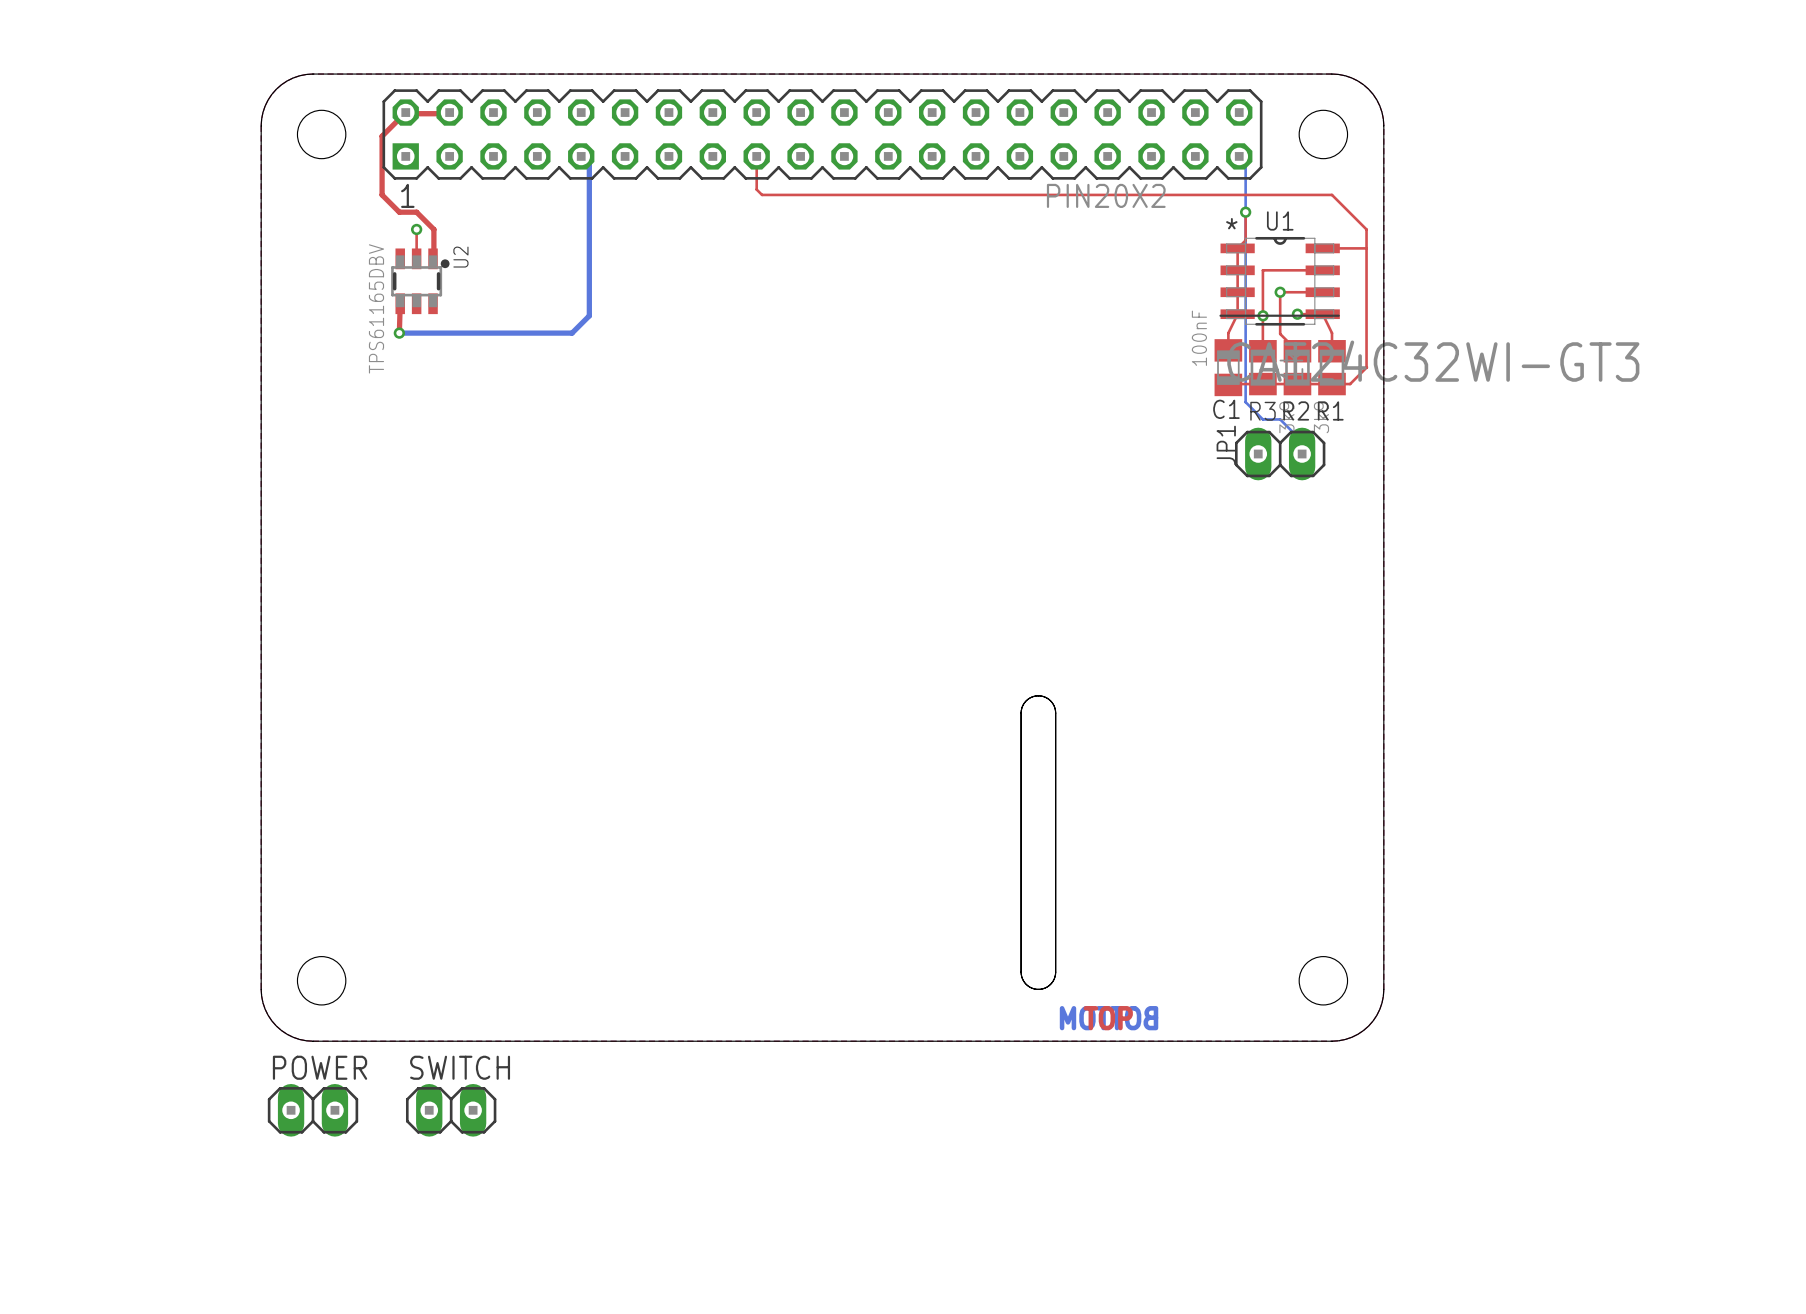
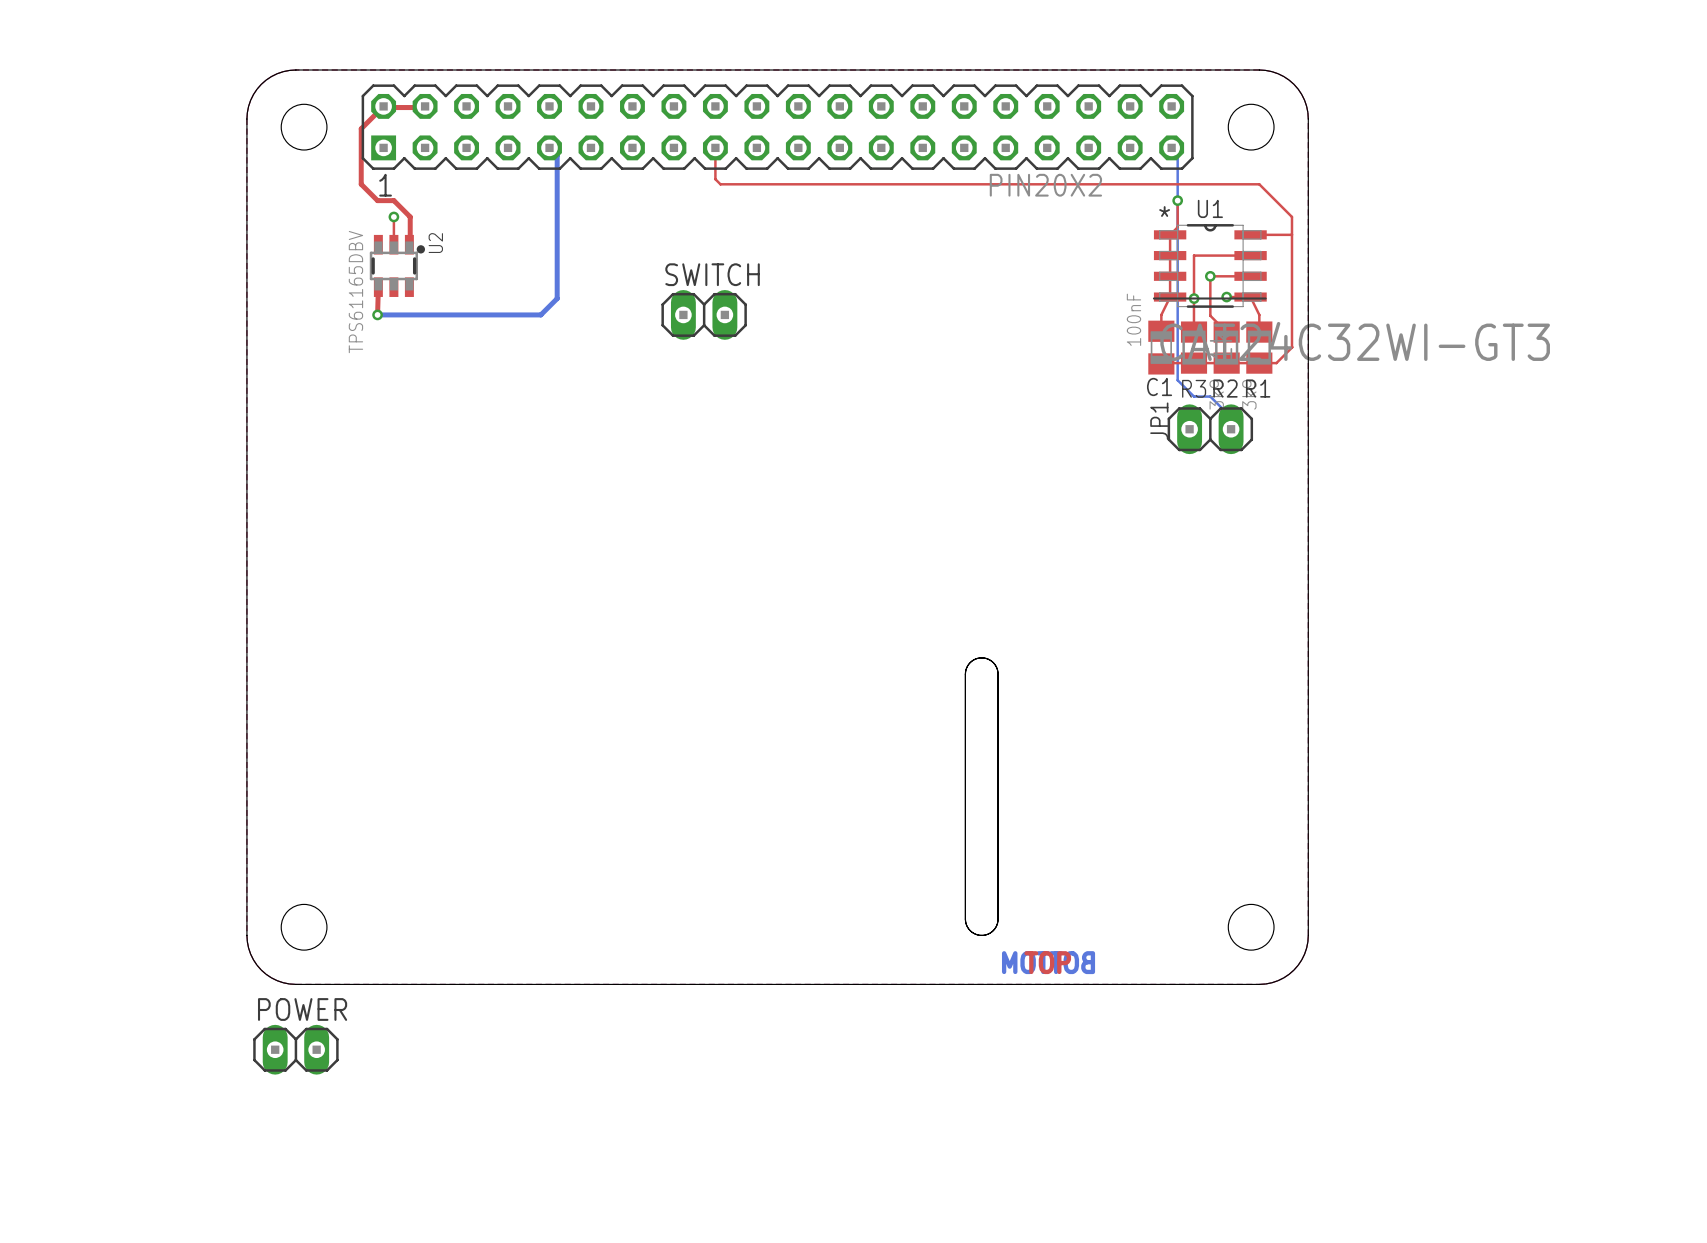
SWITCH: none -> (704, 314)
SWITCH: (451, 1110) -> none

